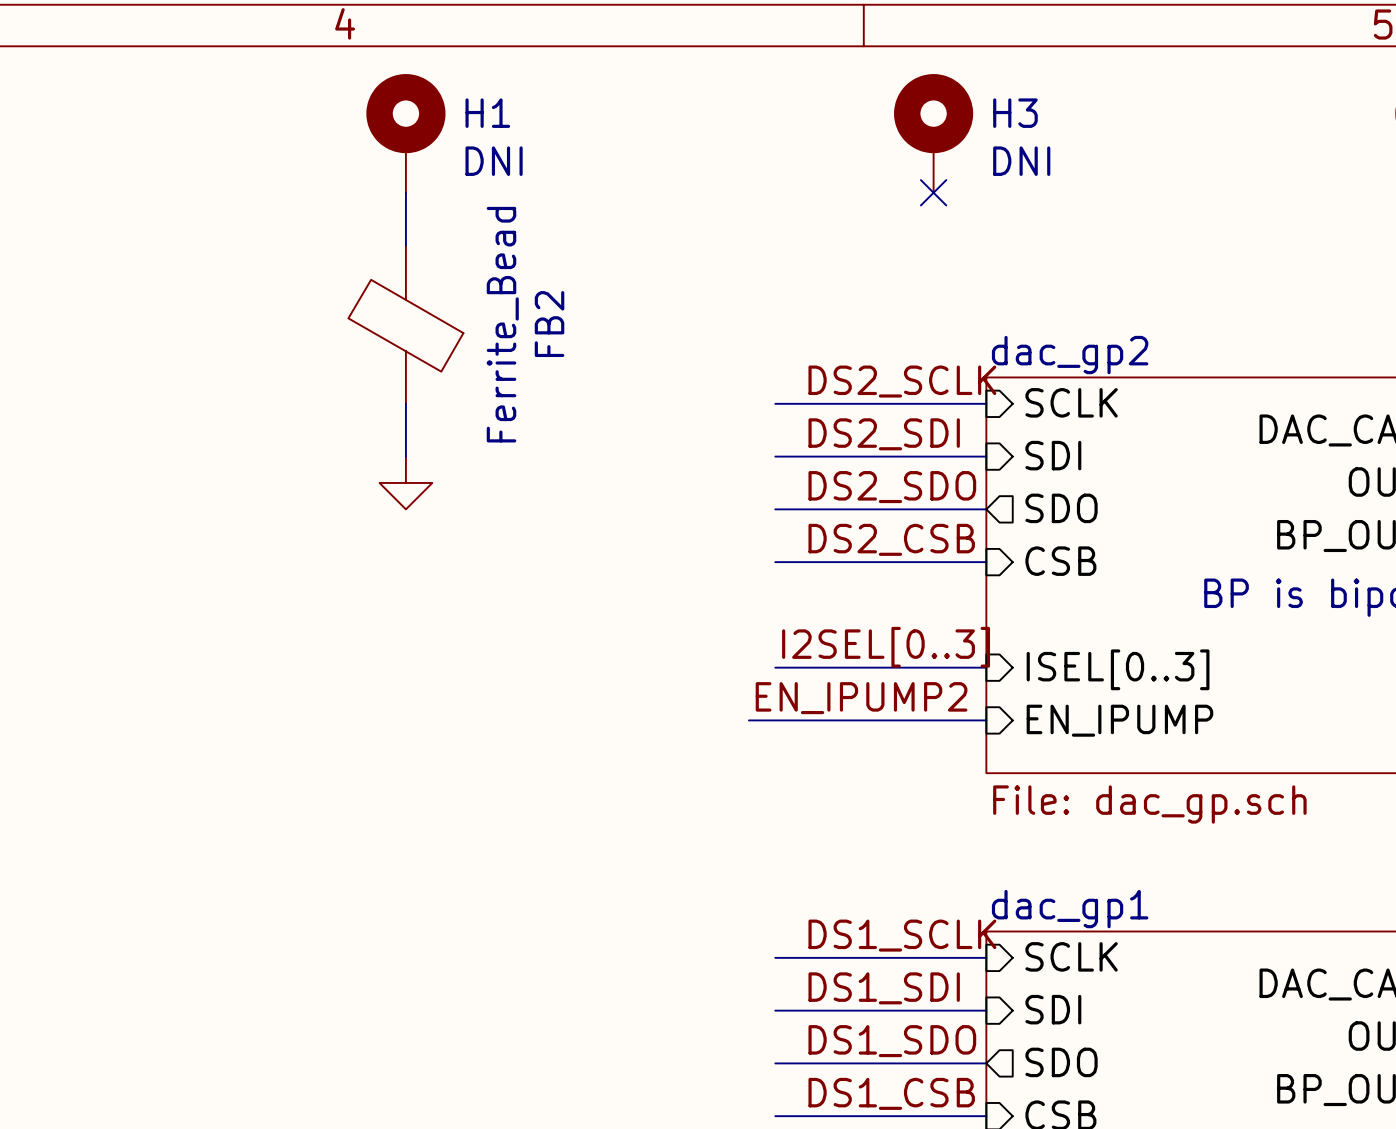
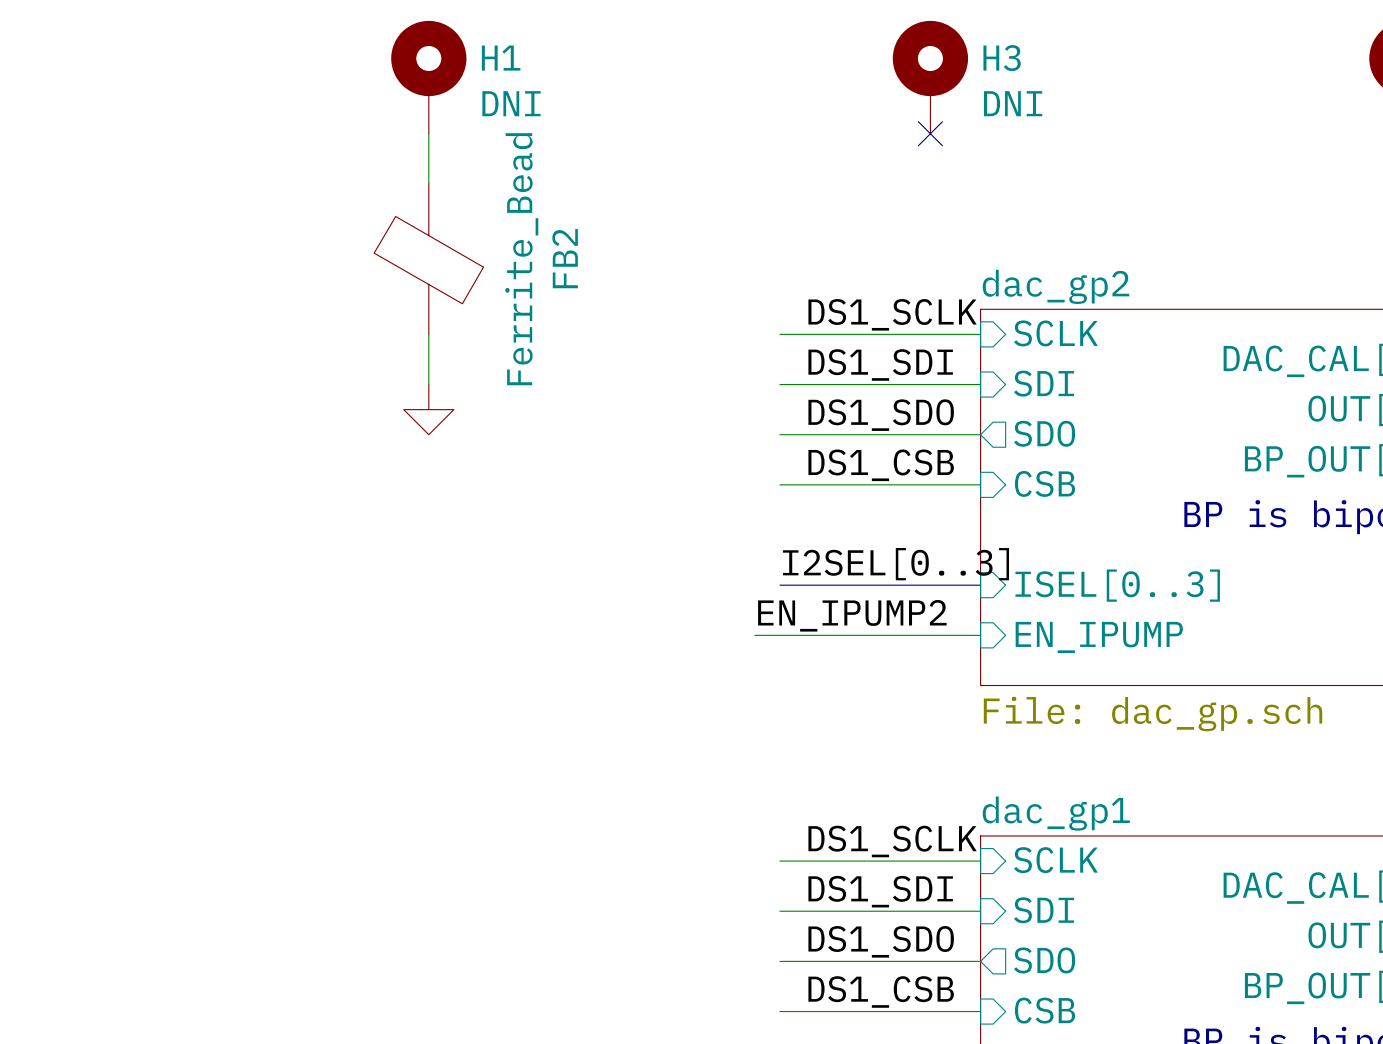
label: DS2_SCLK (902, 381) -> DS1_SCLK (892, 314)
label: DS2_SDI (884, 434) -> DS1_SDI (880, 364)
label: DS2_SDO (892, 487) -> DS1_SDO (881, 415)
label: DS2_CSB (891, 539) -> DS1_CSB (881, 465)

